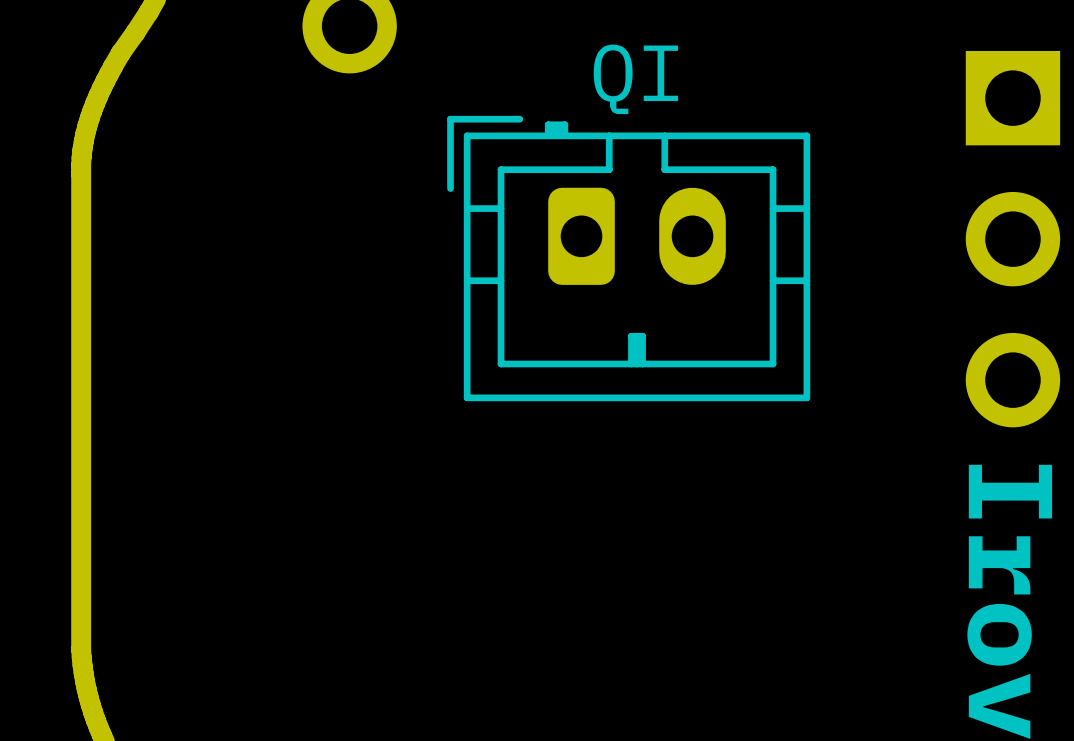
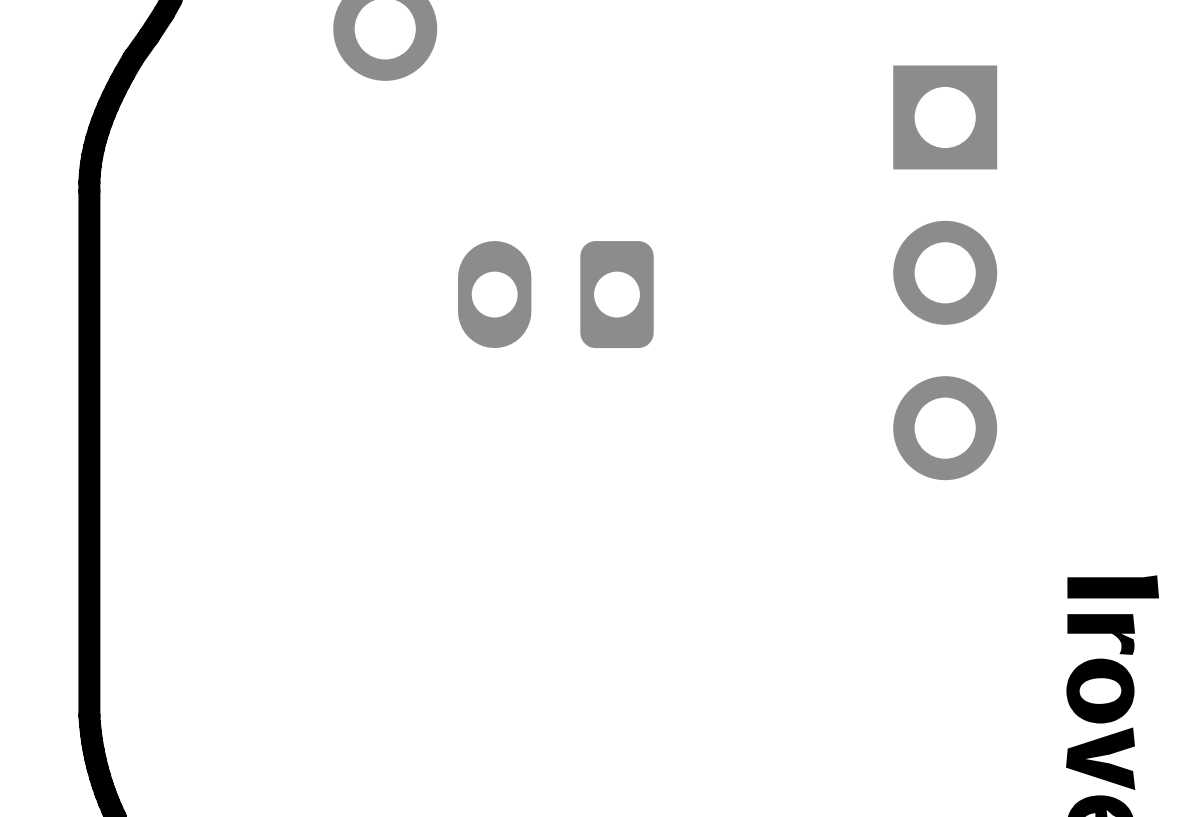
part position: (1012, 239) -> (945, 272)
QI side: bottom (628, 258) -> top (555, 294)

